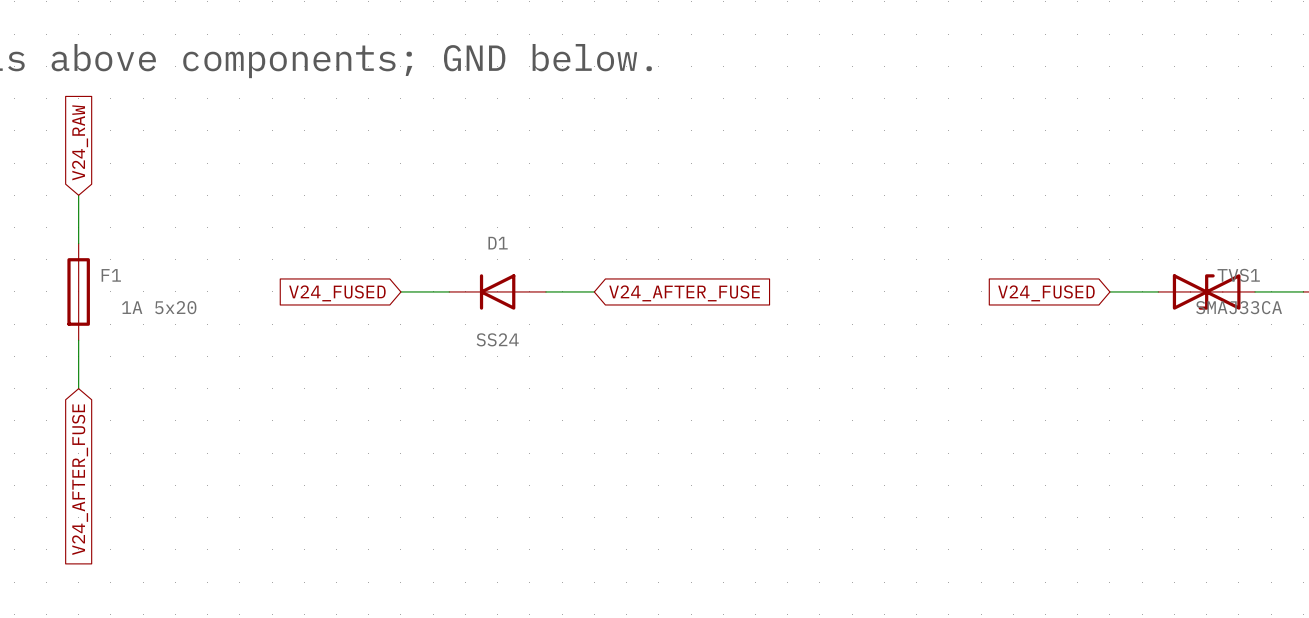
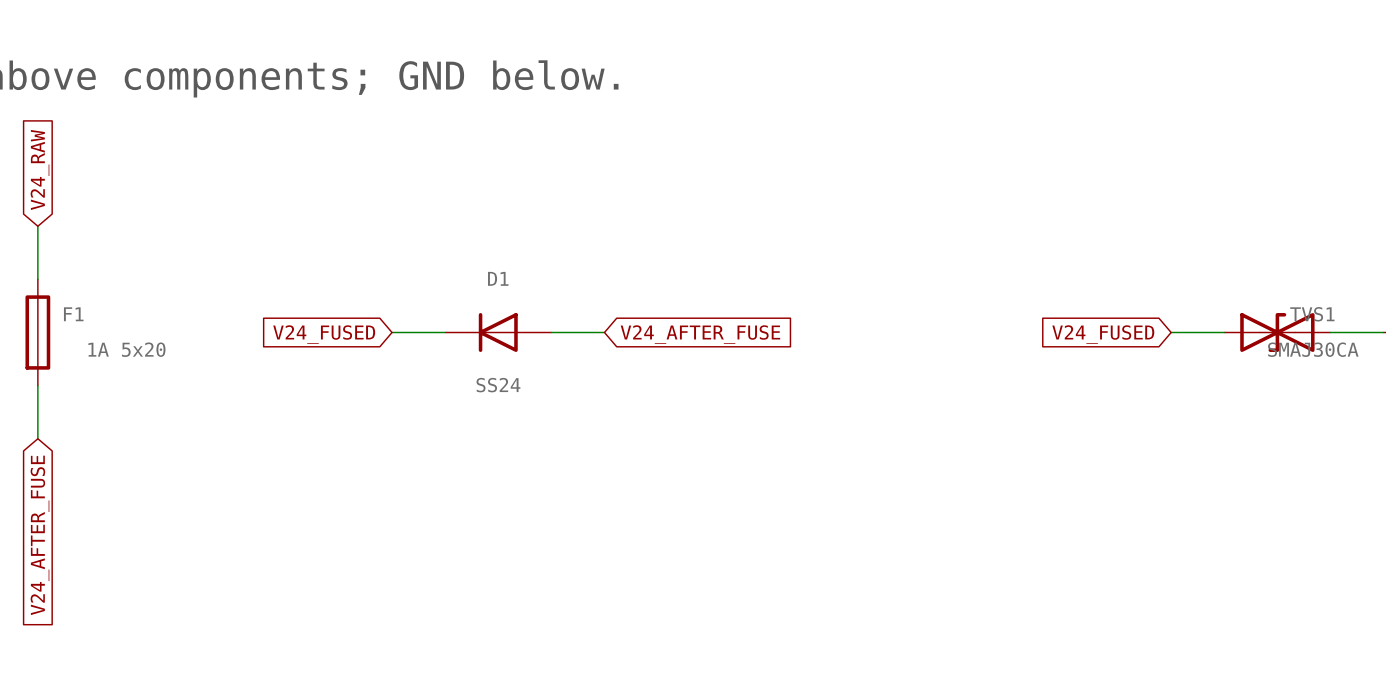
TVS1 value: SMAJ33CA (1239, 307) -> SMAJ30CA (1313, 349)

